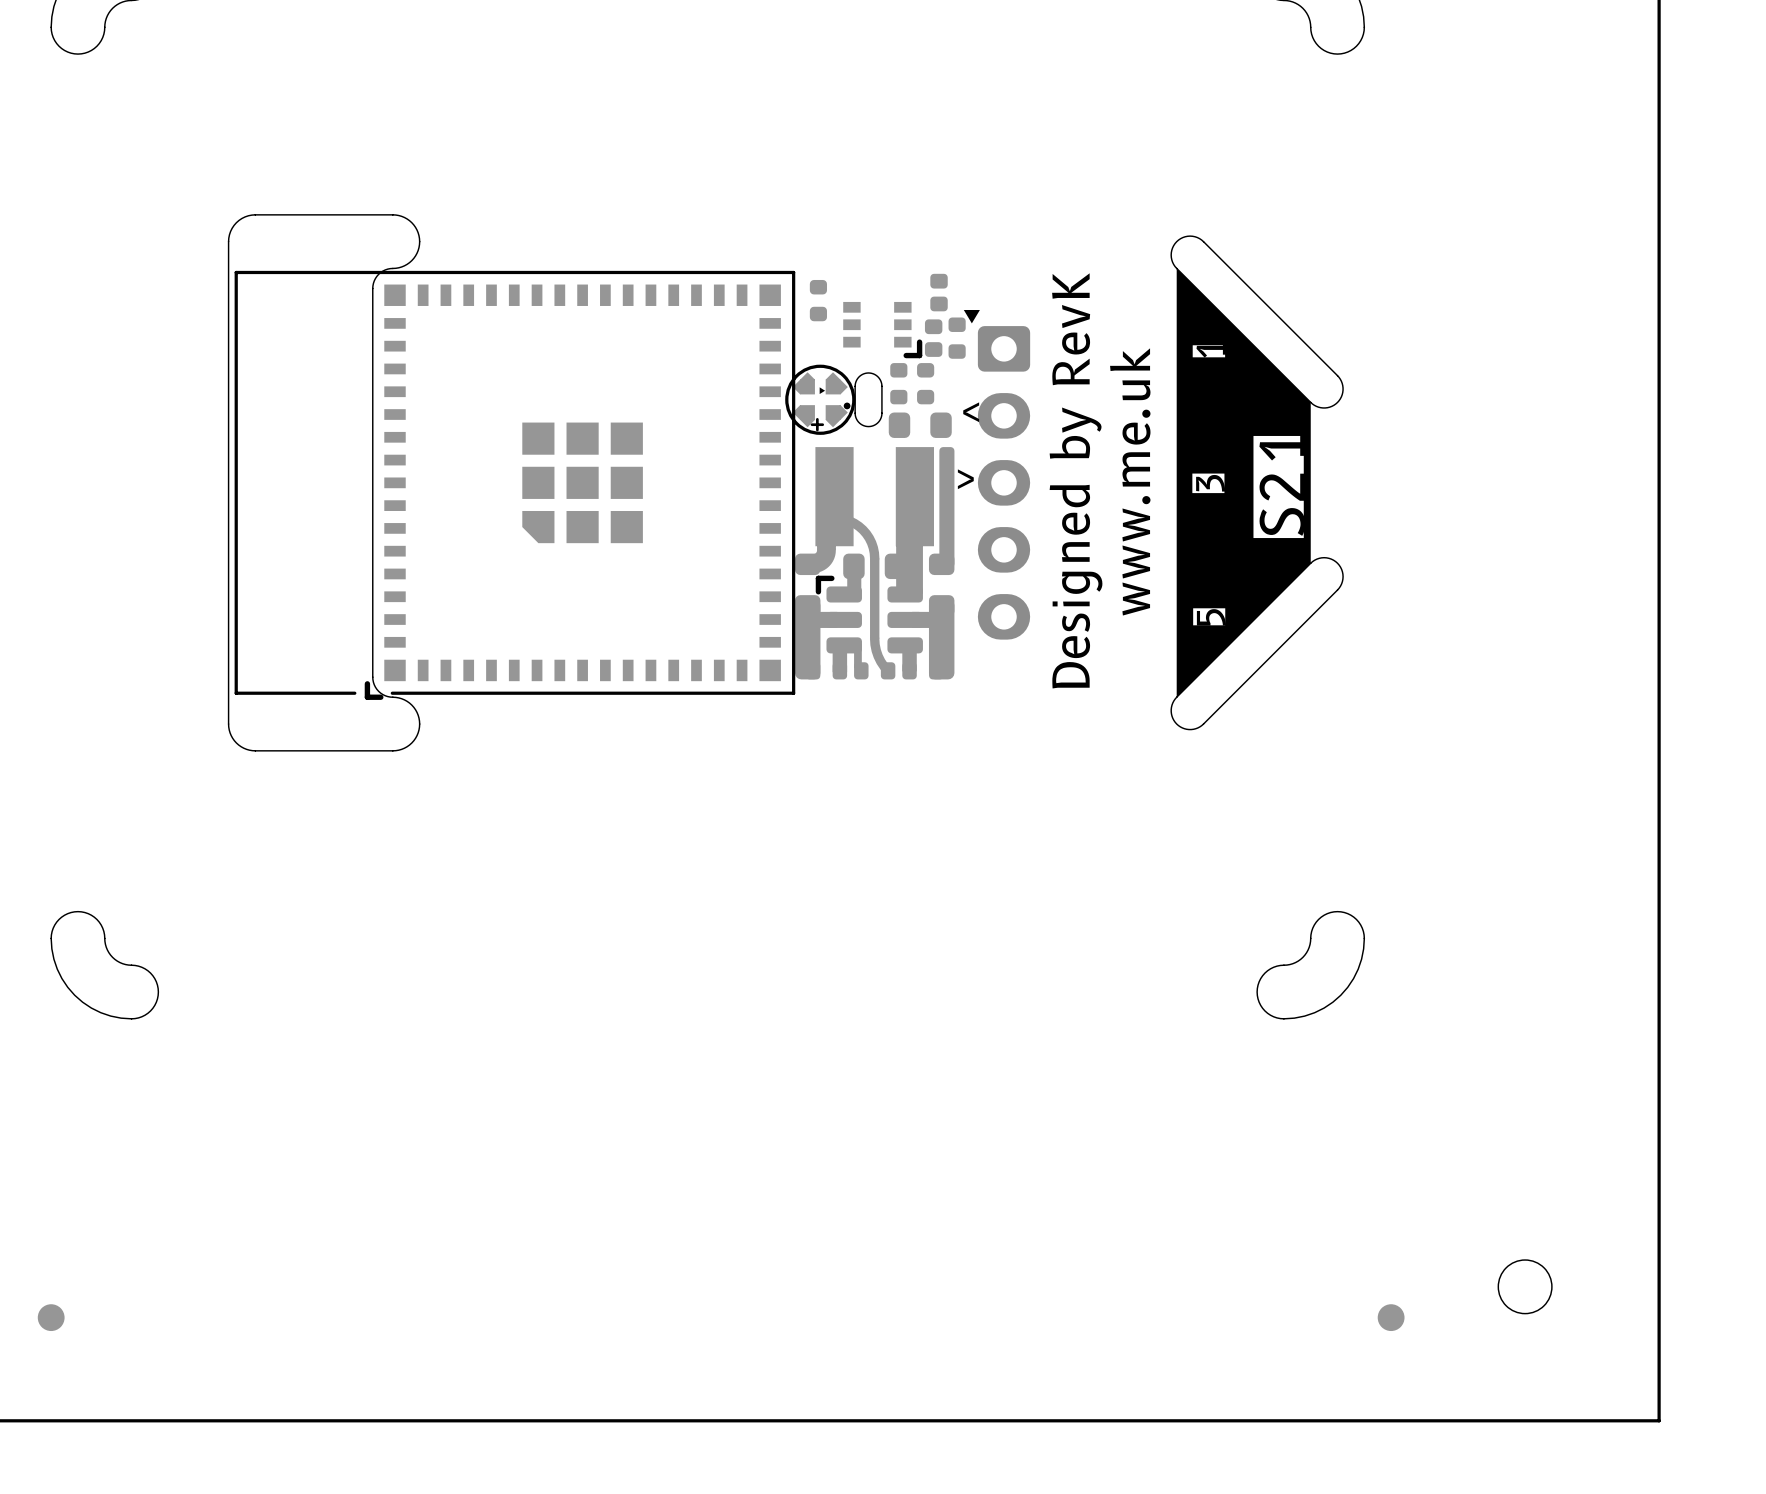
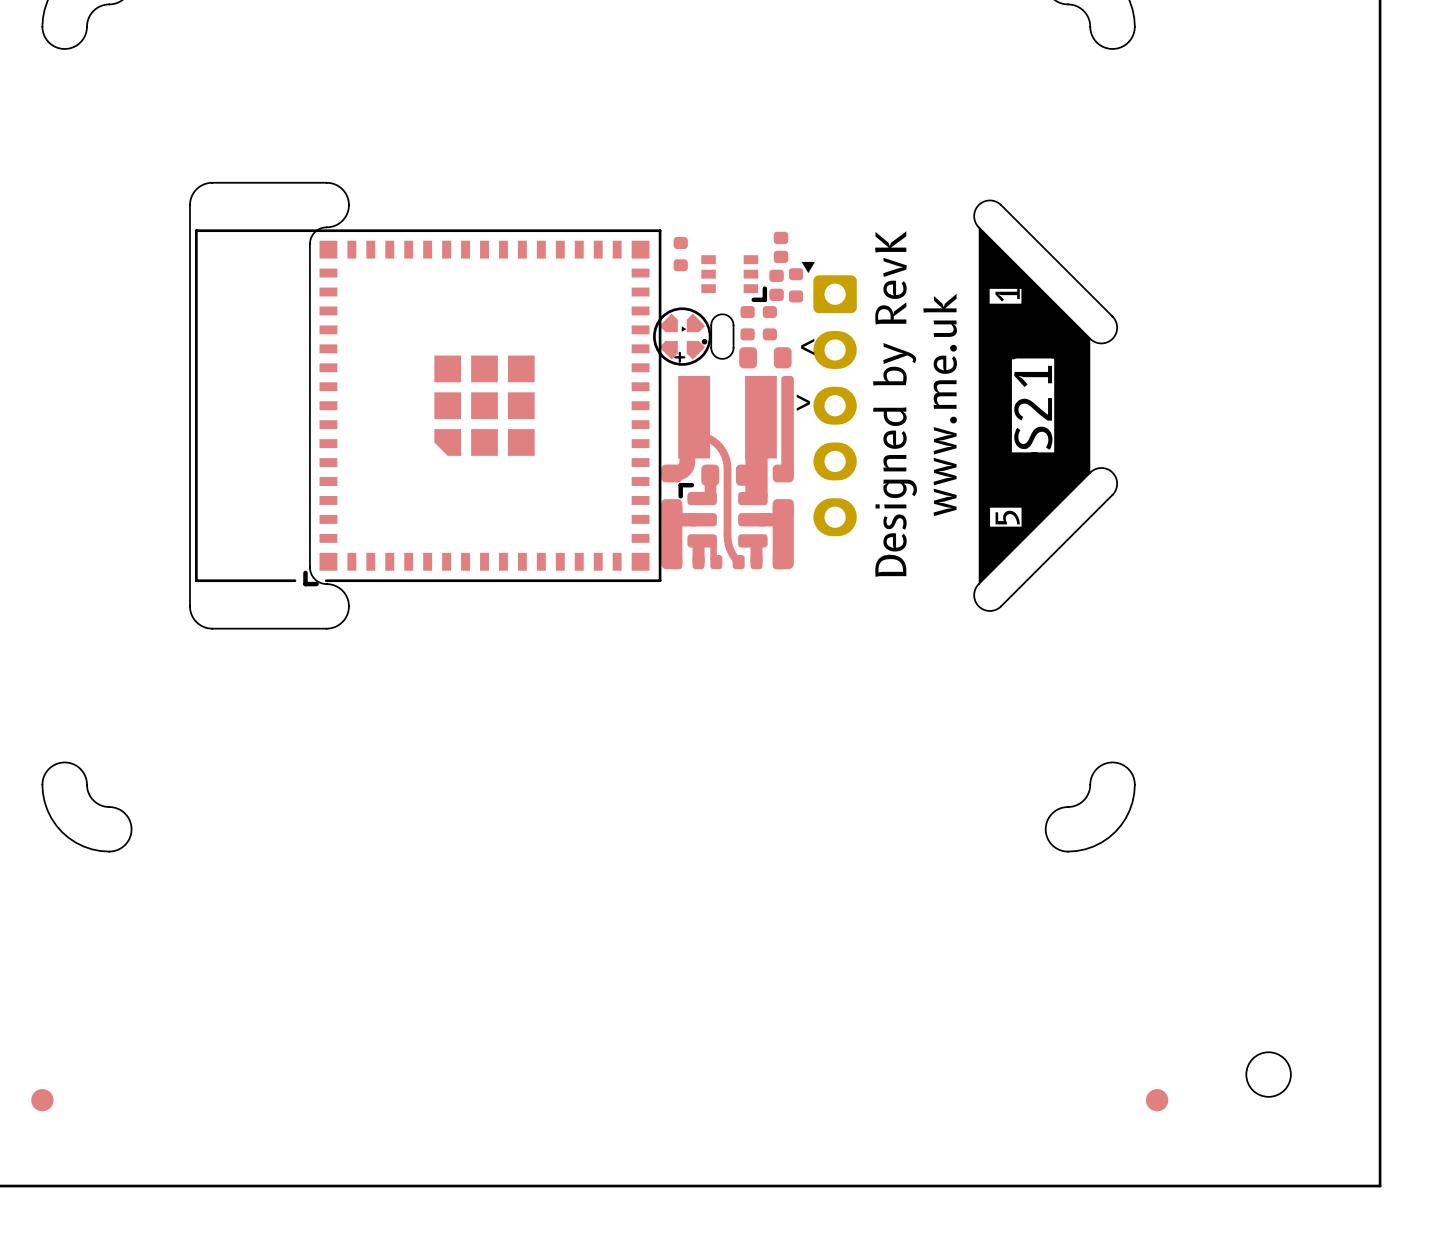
drawing shape: [1176, 268, 1311, 698] -> [978, 227, 1091, 585]
text: 3 (1210, 483) -> none
text position: S21 (1282, 485) -> S21 (1033, 407)

